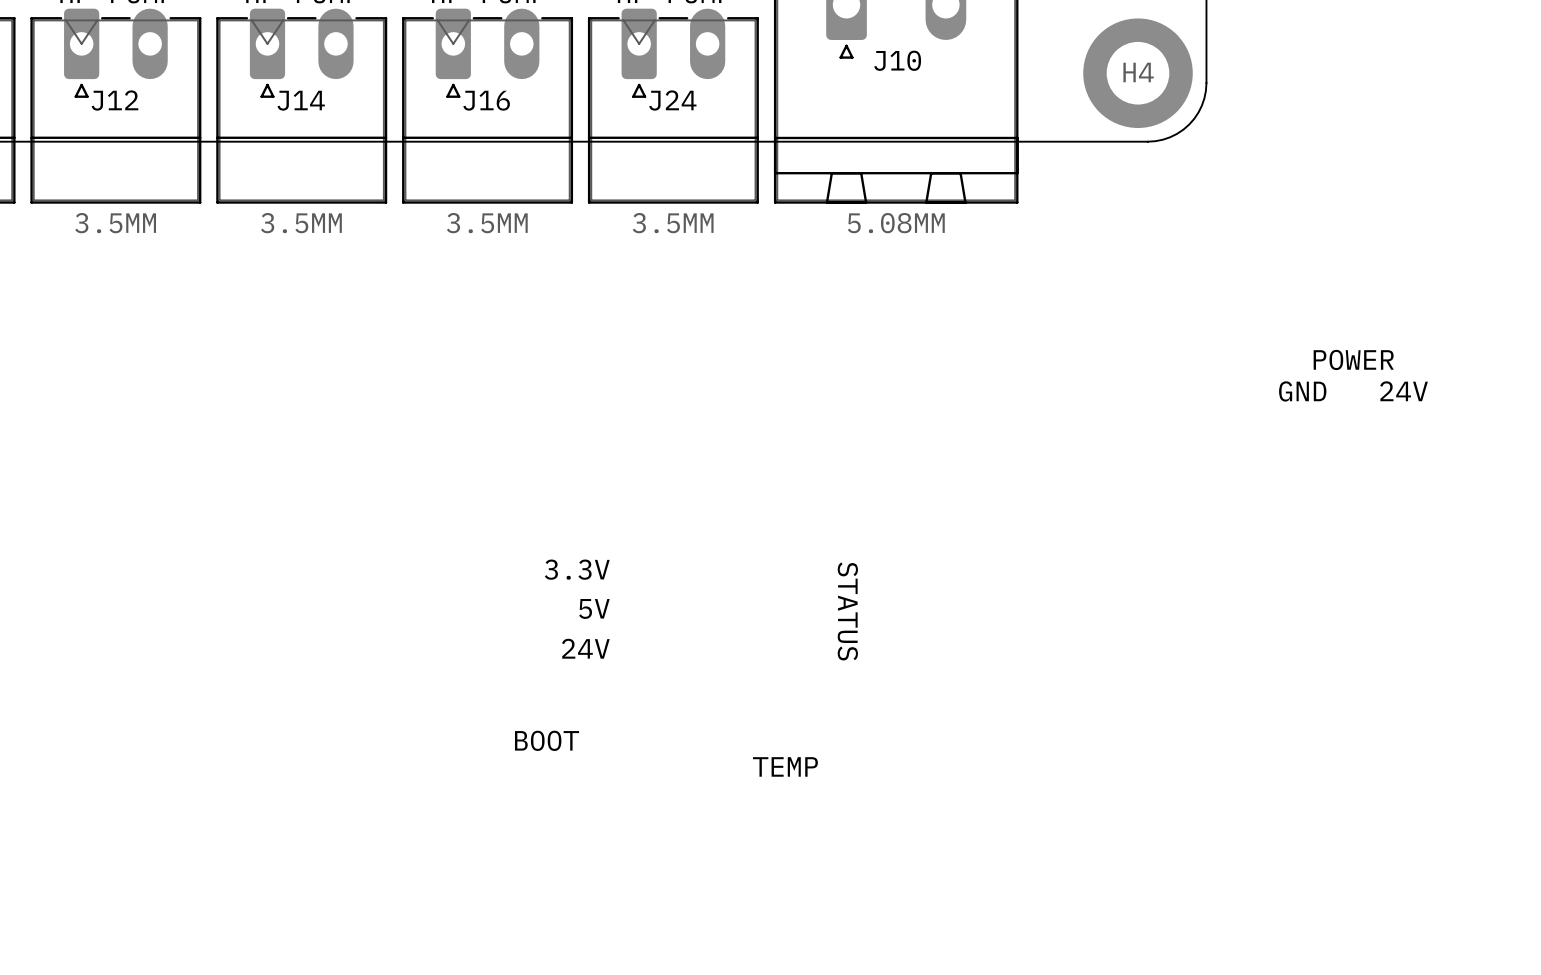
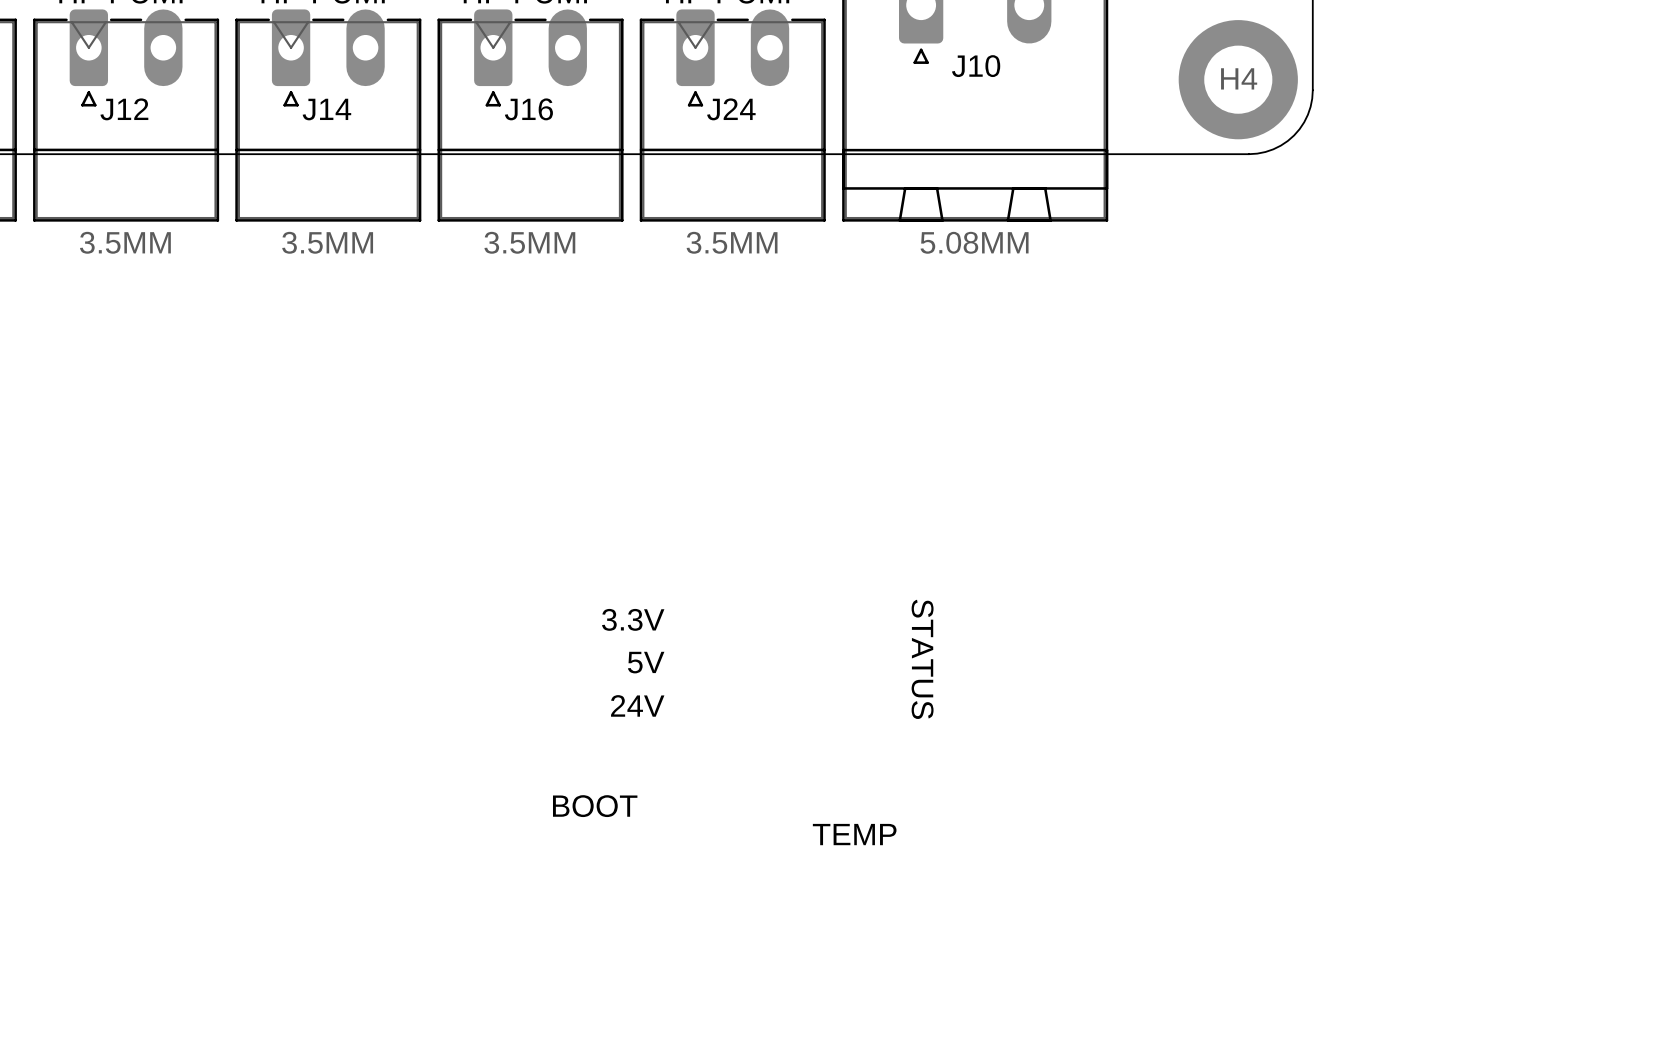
text: POWER (1353, 359) -> none
text: GND 24V (1353, 391) -> none

